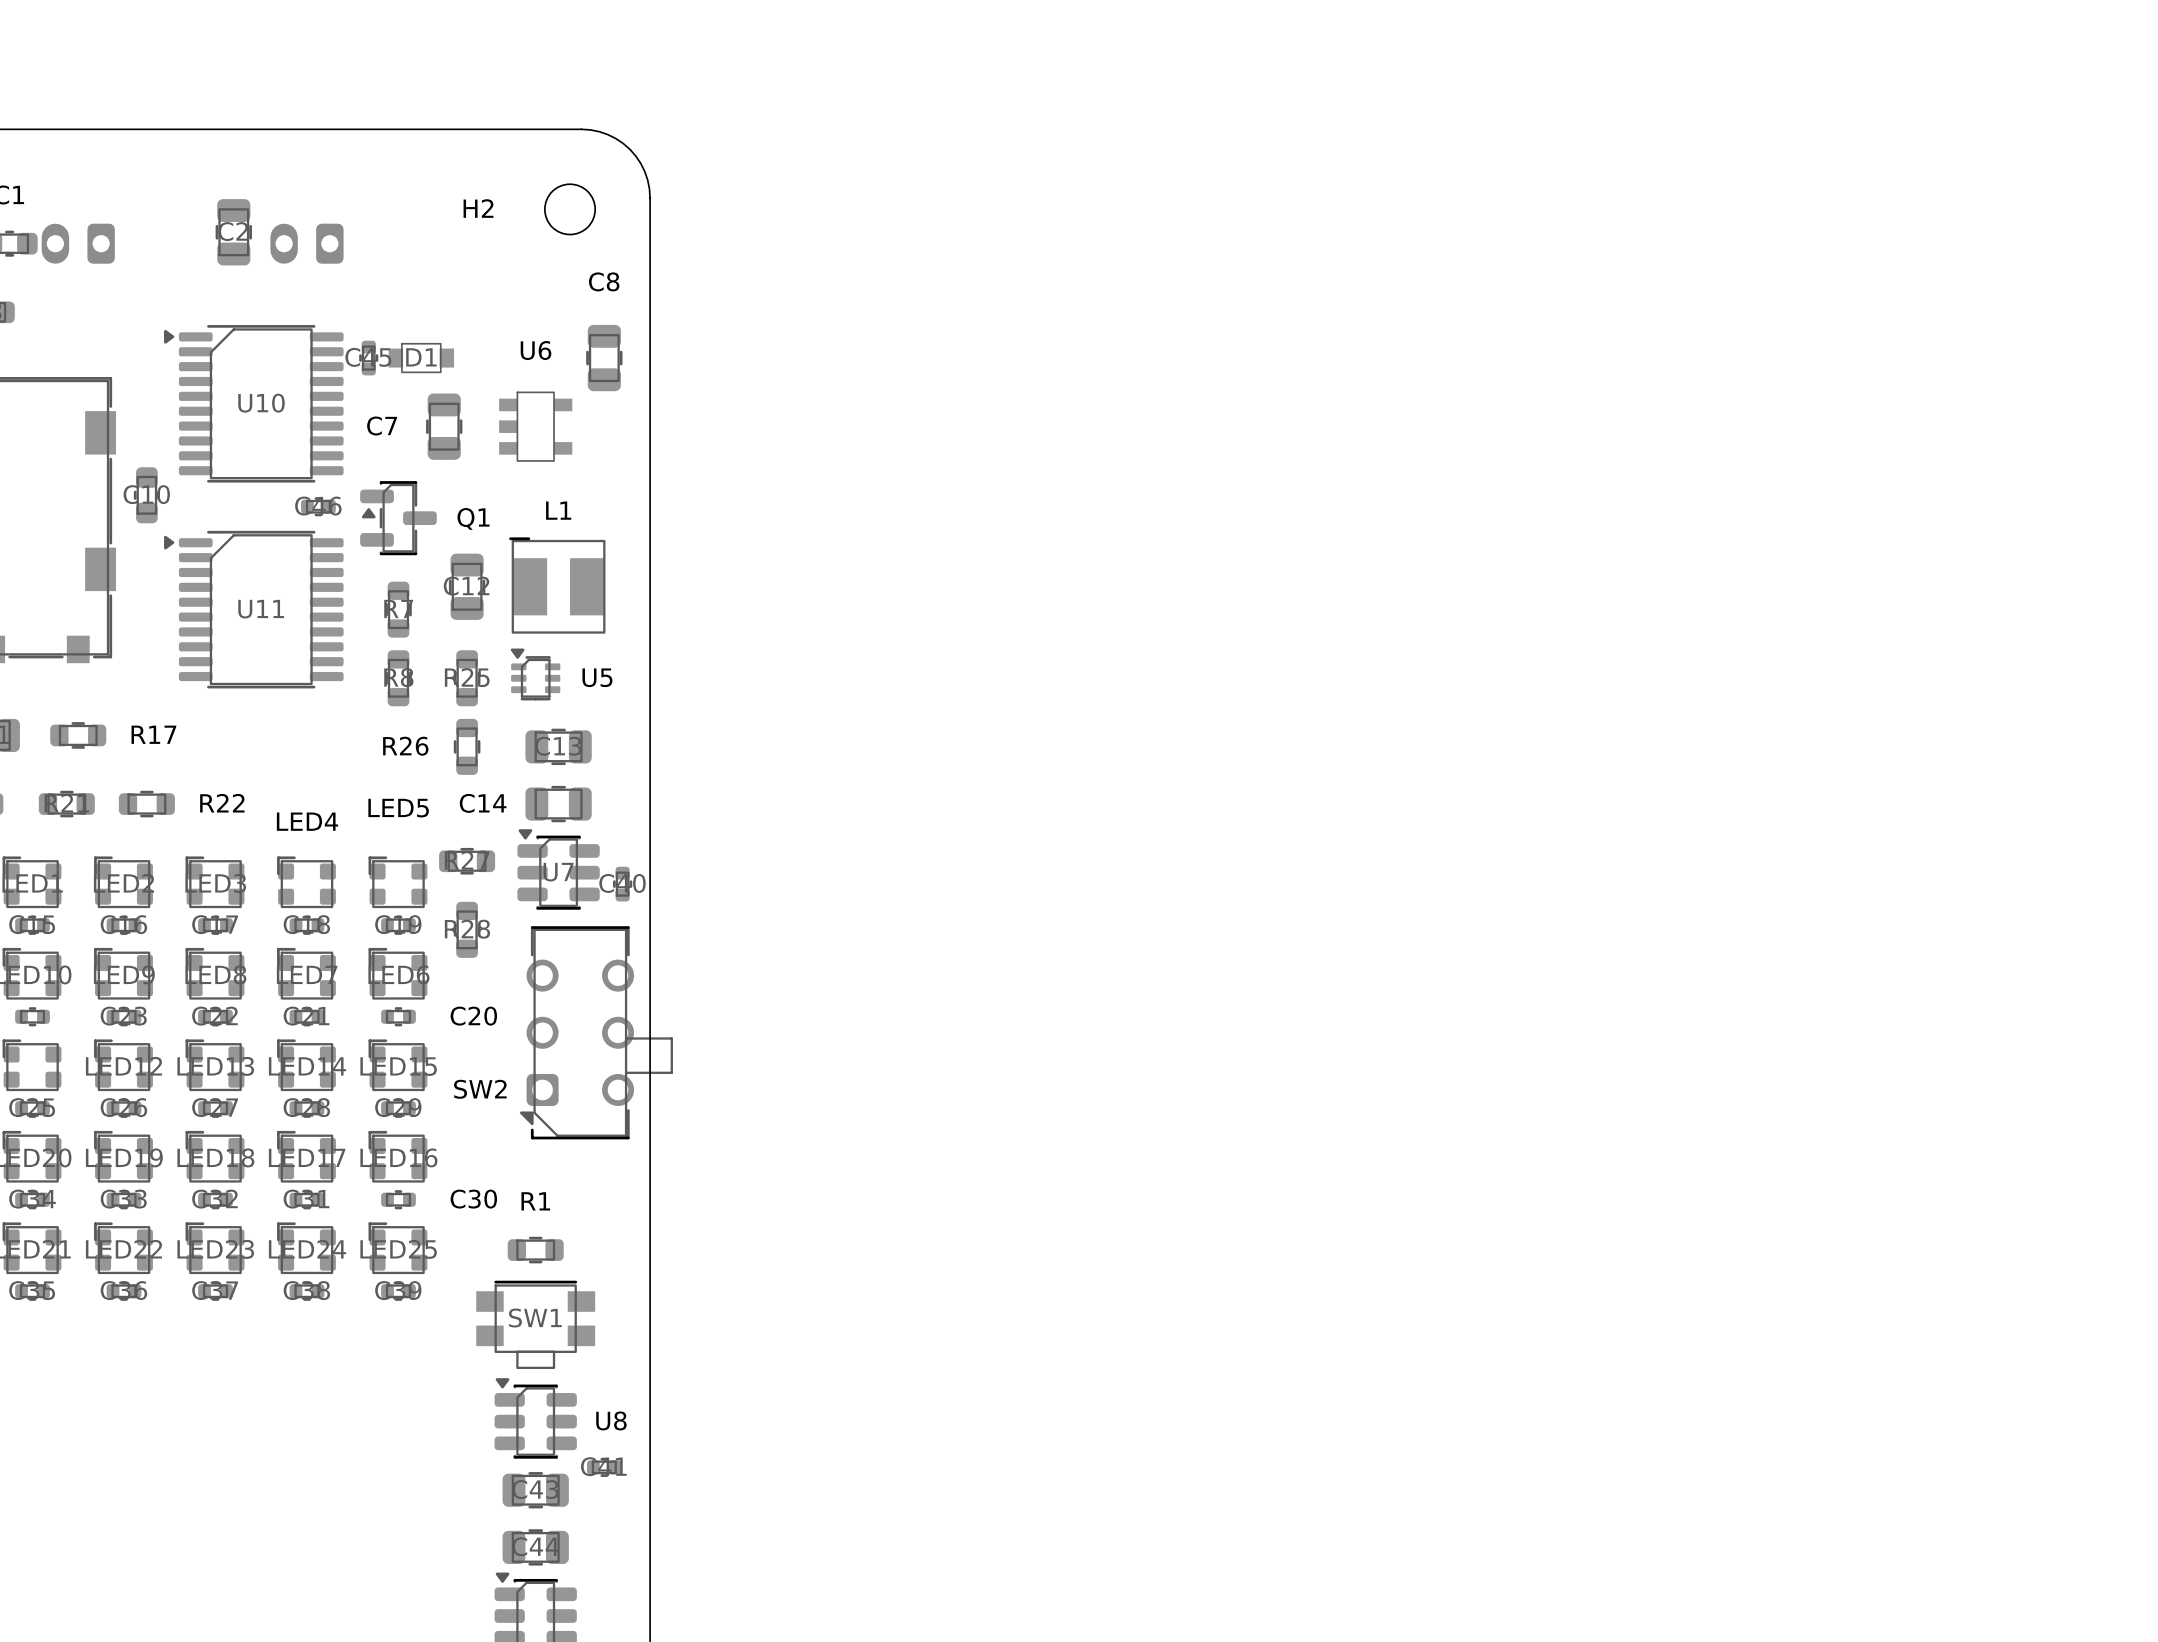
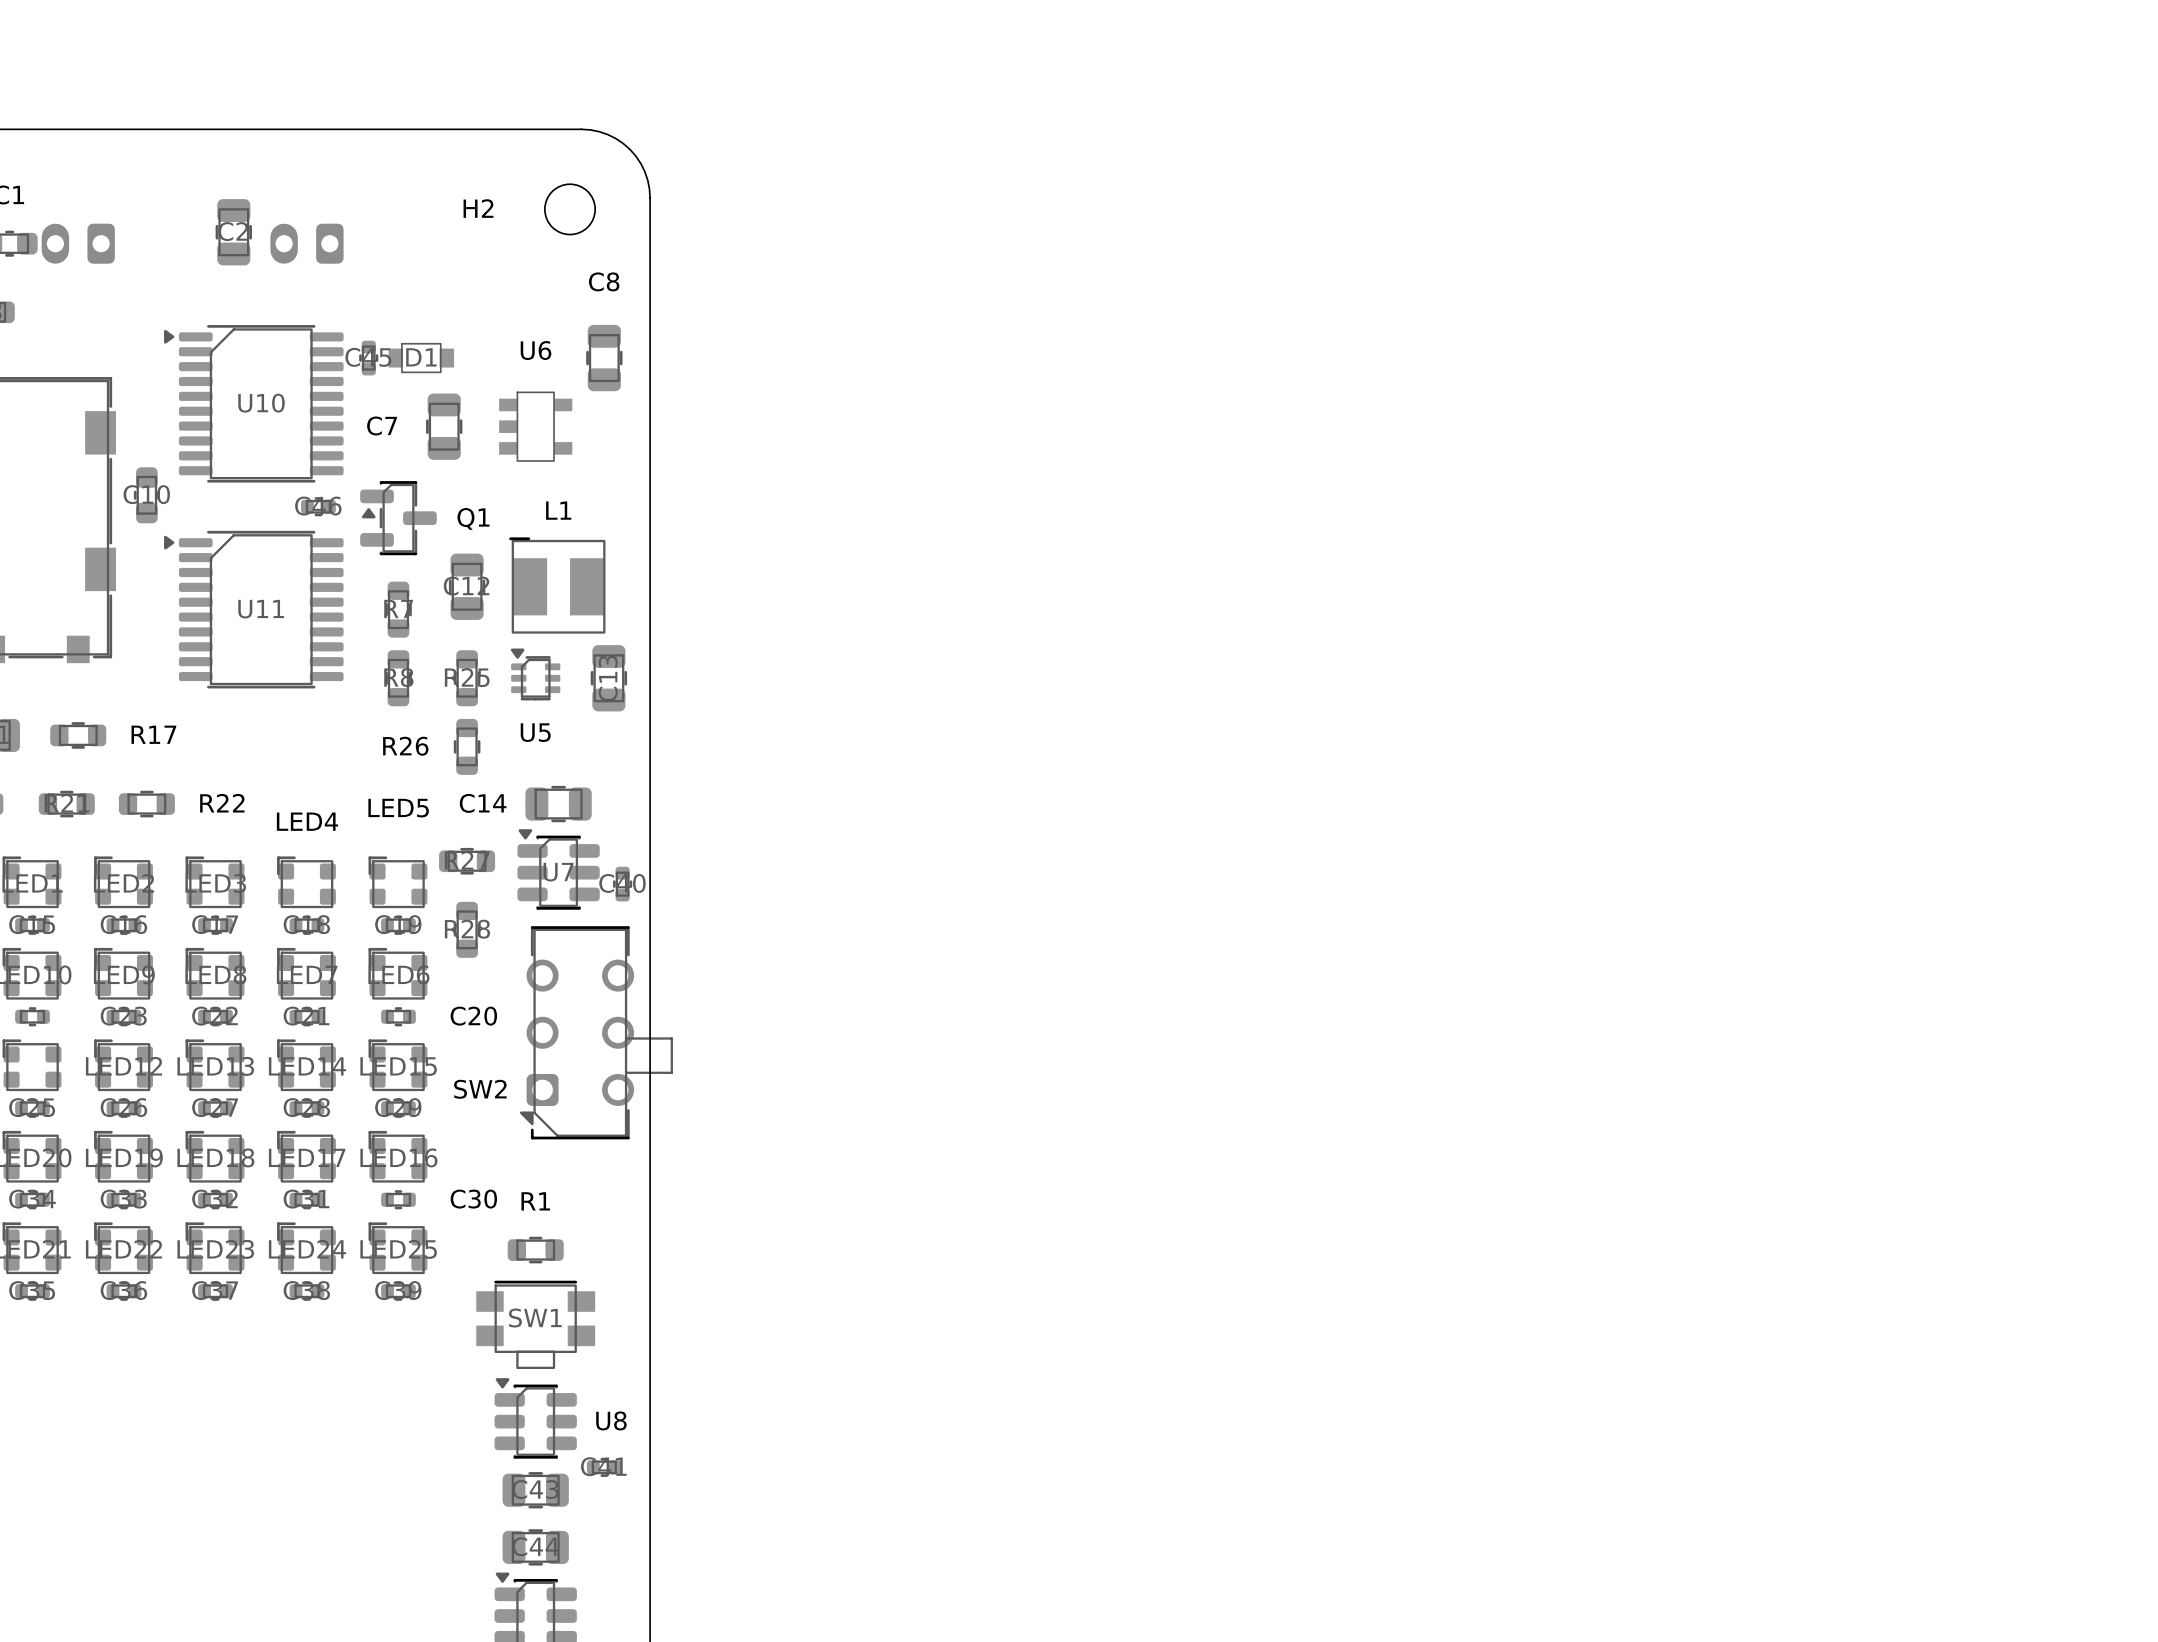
U5 name position: U5 (597, 677) -> U5 (535, 732)
part rotation: 0° (558, 746) -> 90° clockwise (608, 678)
part position: (558, 746) -> (608, 678)

